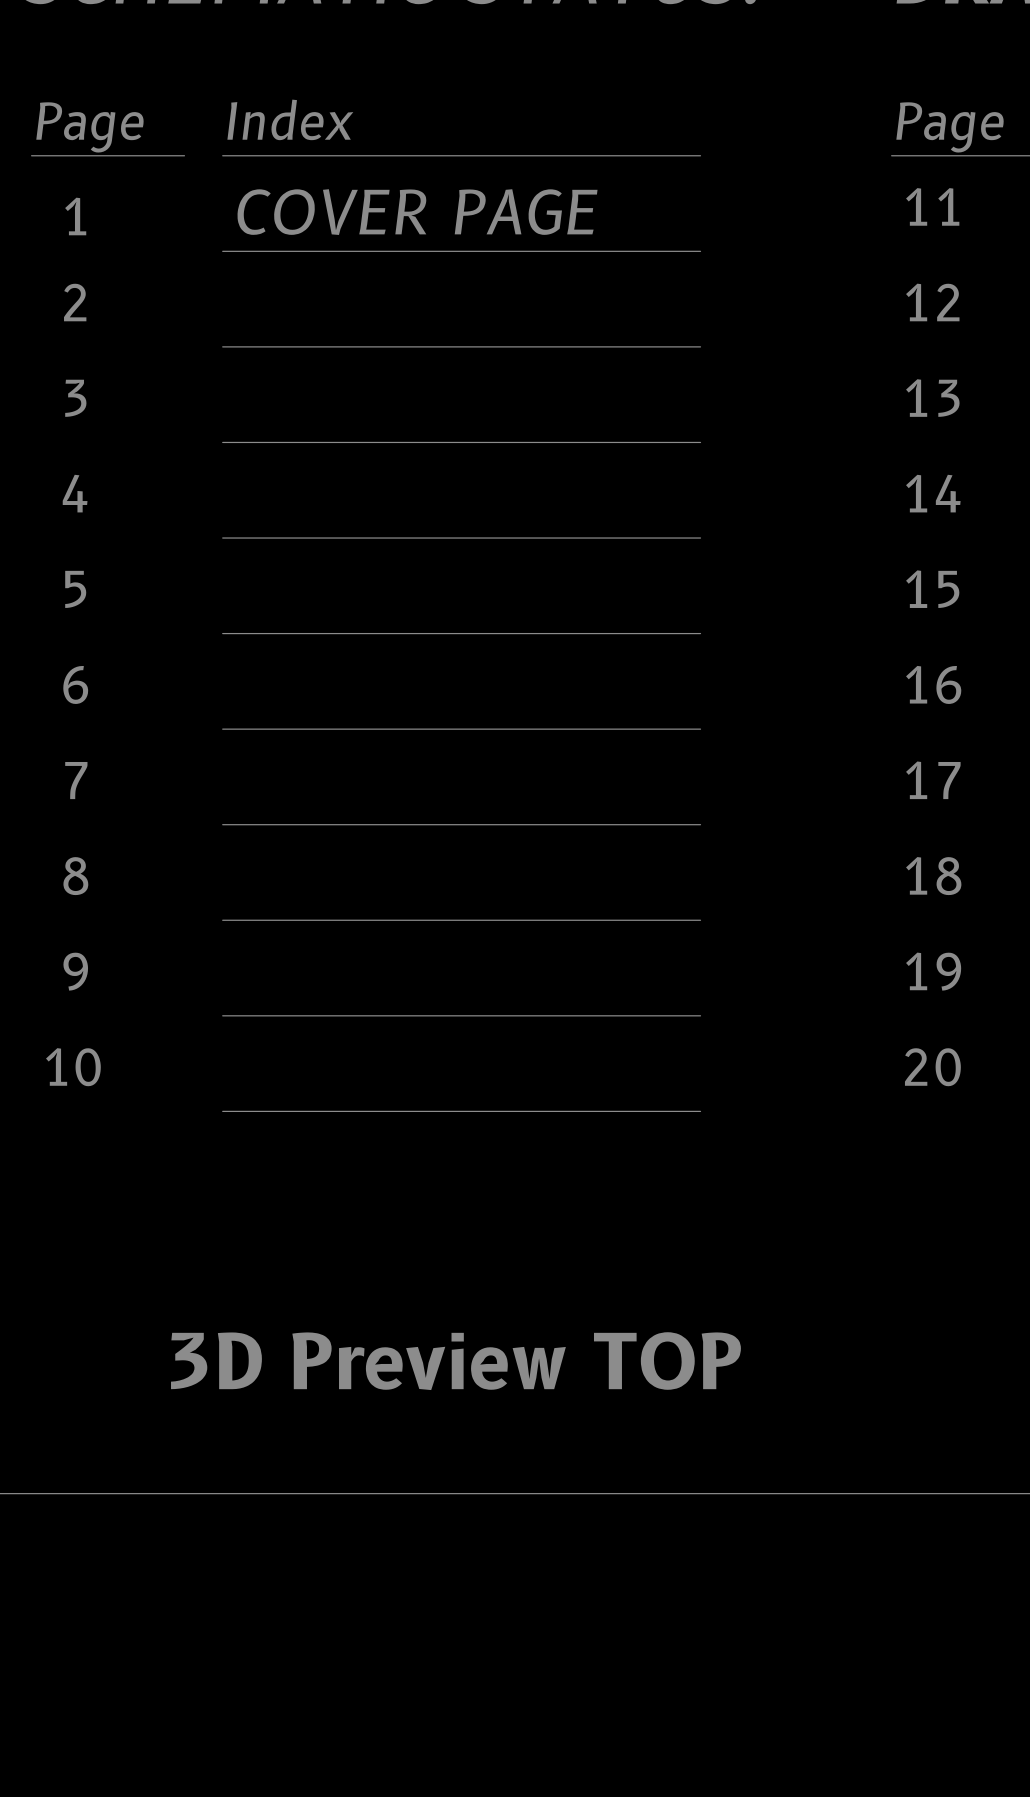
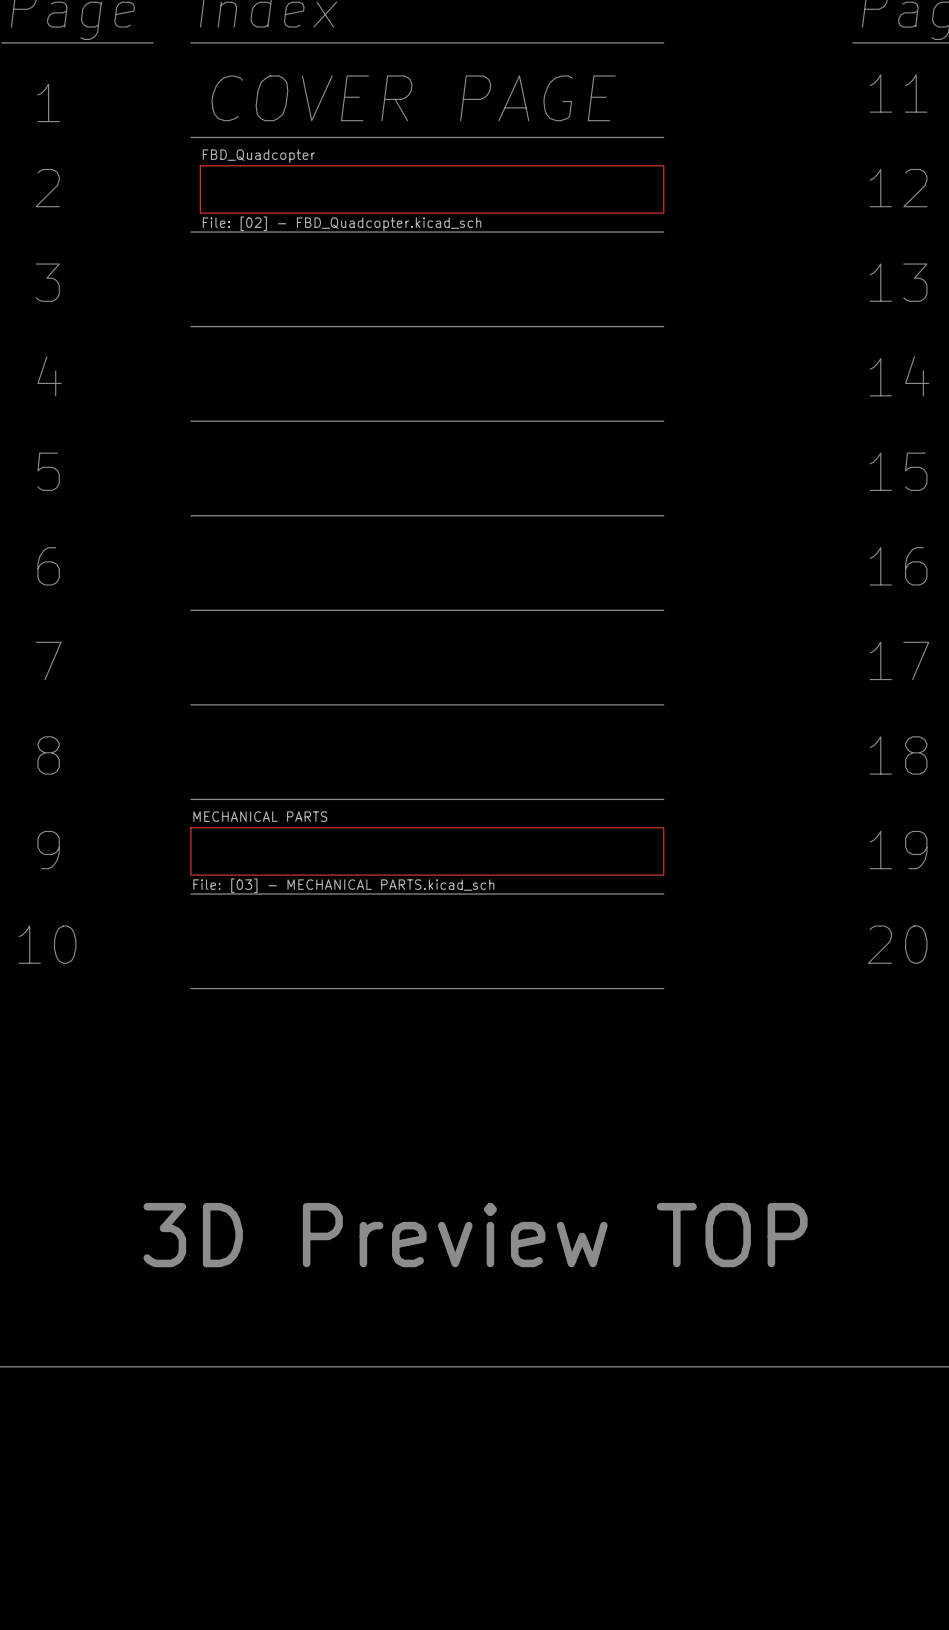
sheet FBD_Quadcopter: none -> File: [02] - FBD_Quadcopter.kicad_sch (432, 189)
sheet MECHANICAL PARTS: none -> File: [03] - MECHANICAL PARTS.kicad_sch (427, 851)

